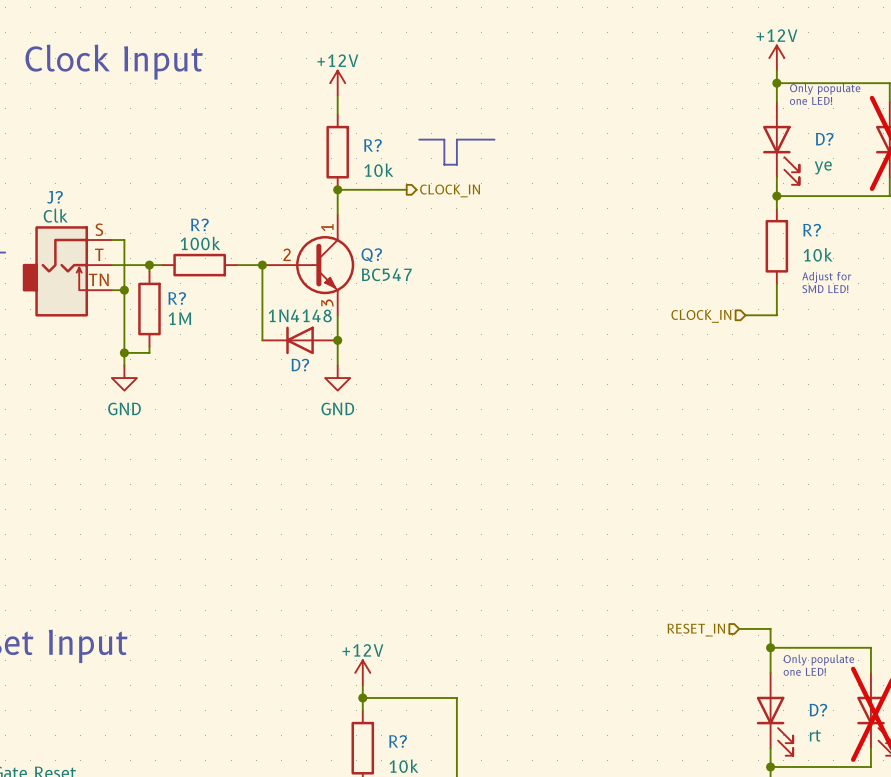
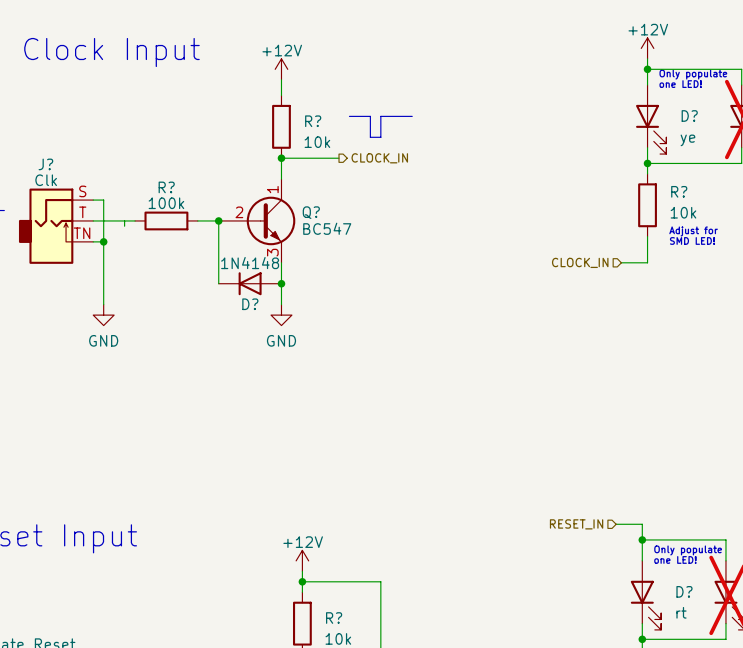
junction: (149, 265) -> none
R?: 1M (149, 309) -> none
wire: (149, 346) (149, 352) (124, 352) -> none
junction: (124, 352) -> none

